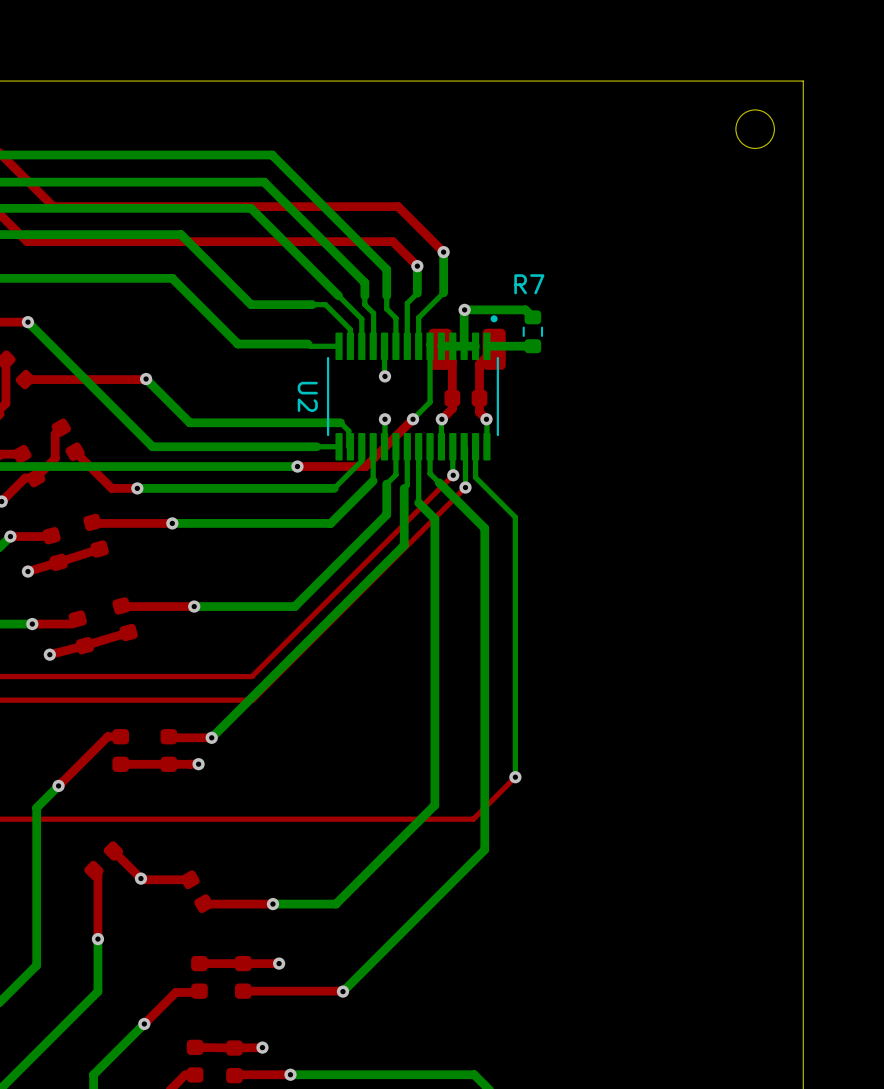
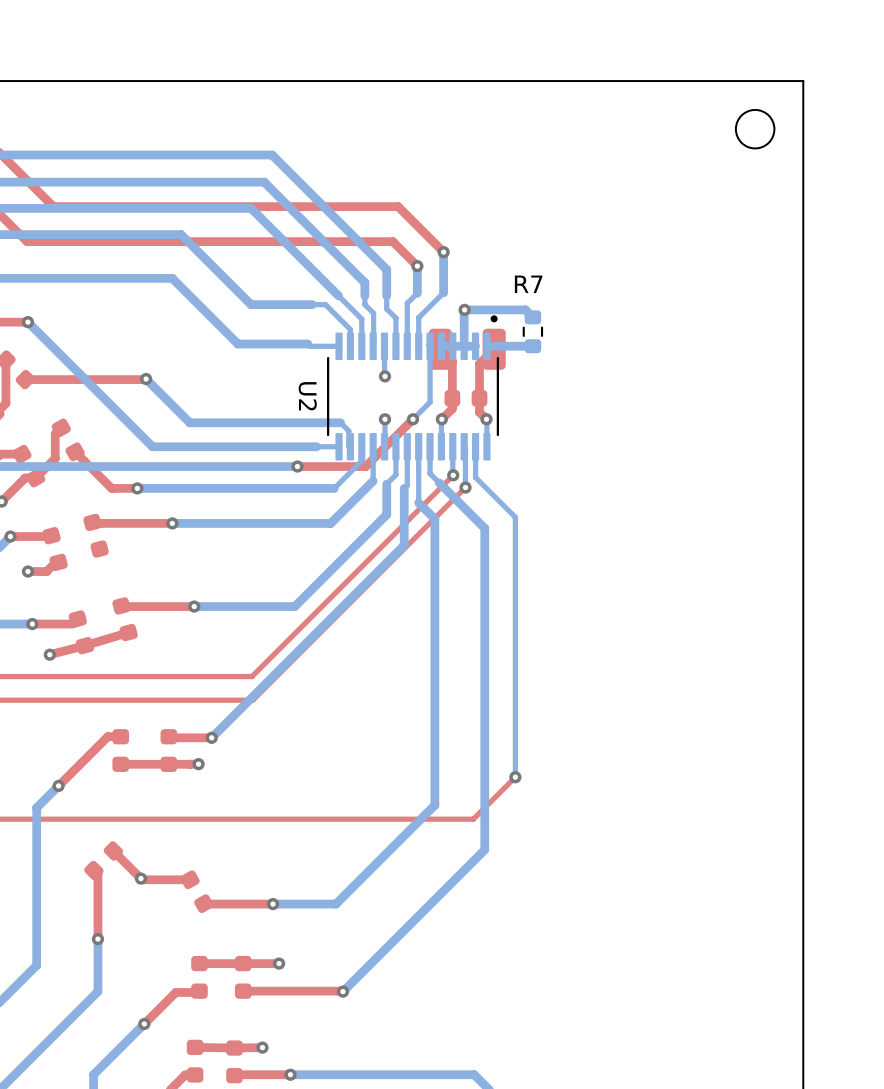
top track: (99, 549) (27, 571) -> (55, 562) (46, 571) (27, 571)

